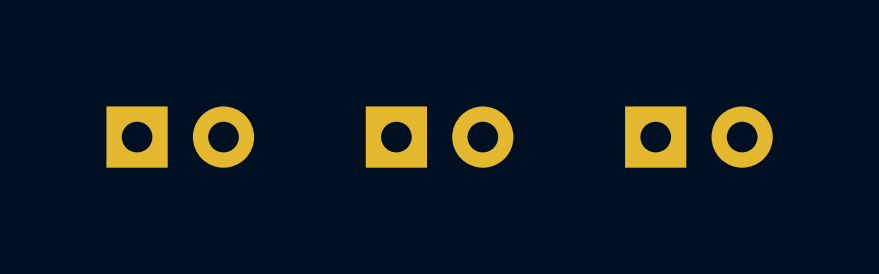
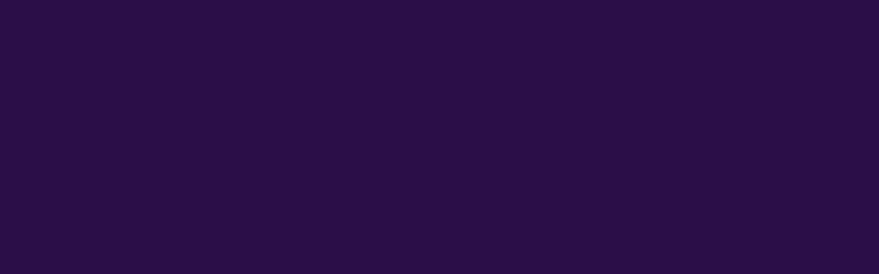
part: (180, 137) -> none
part: (439, 137) -> none
part: (698, 137) -> none

